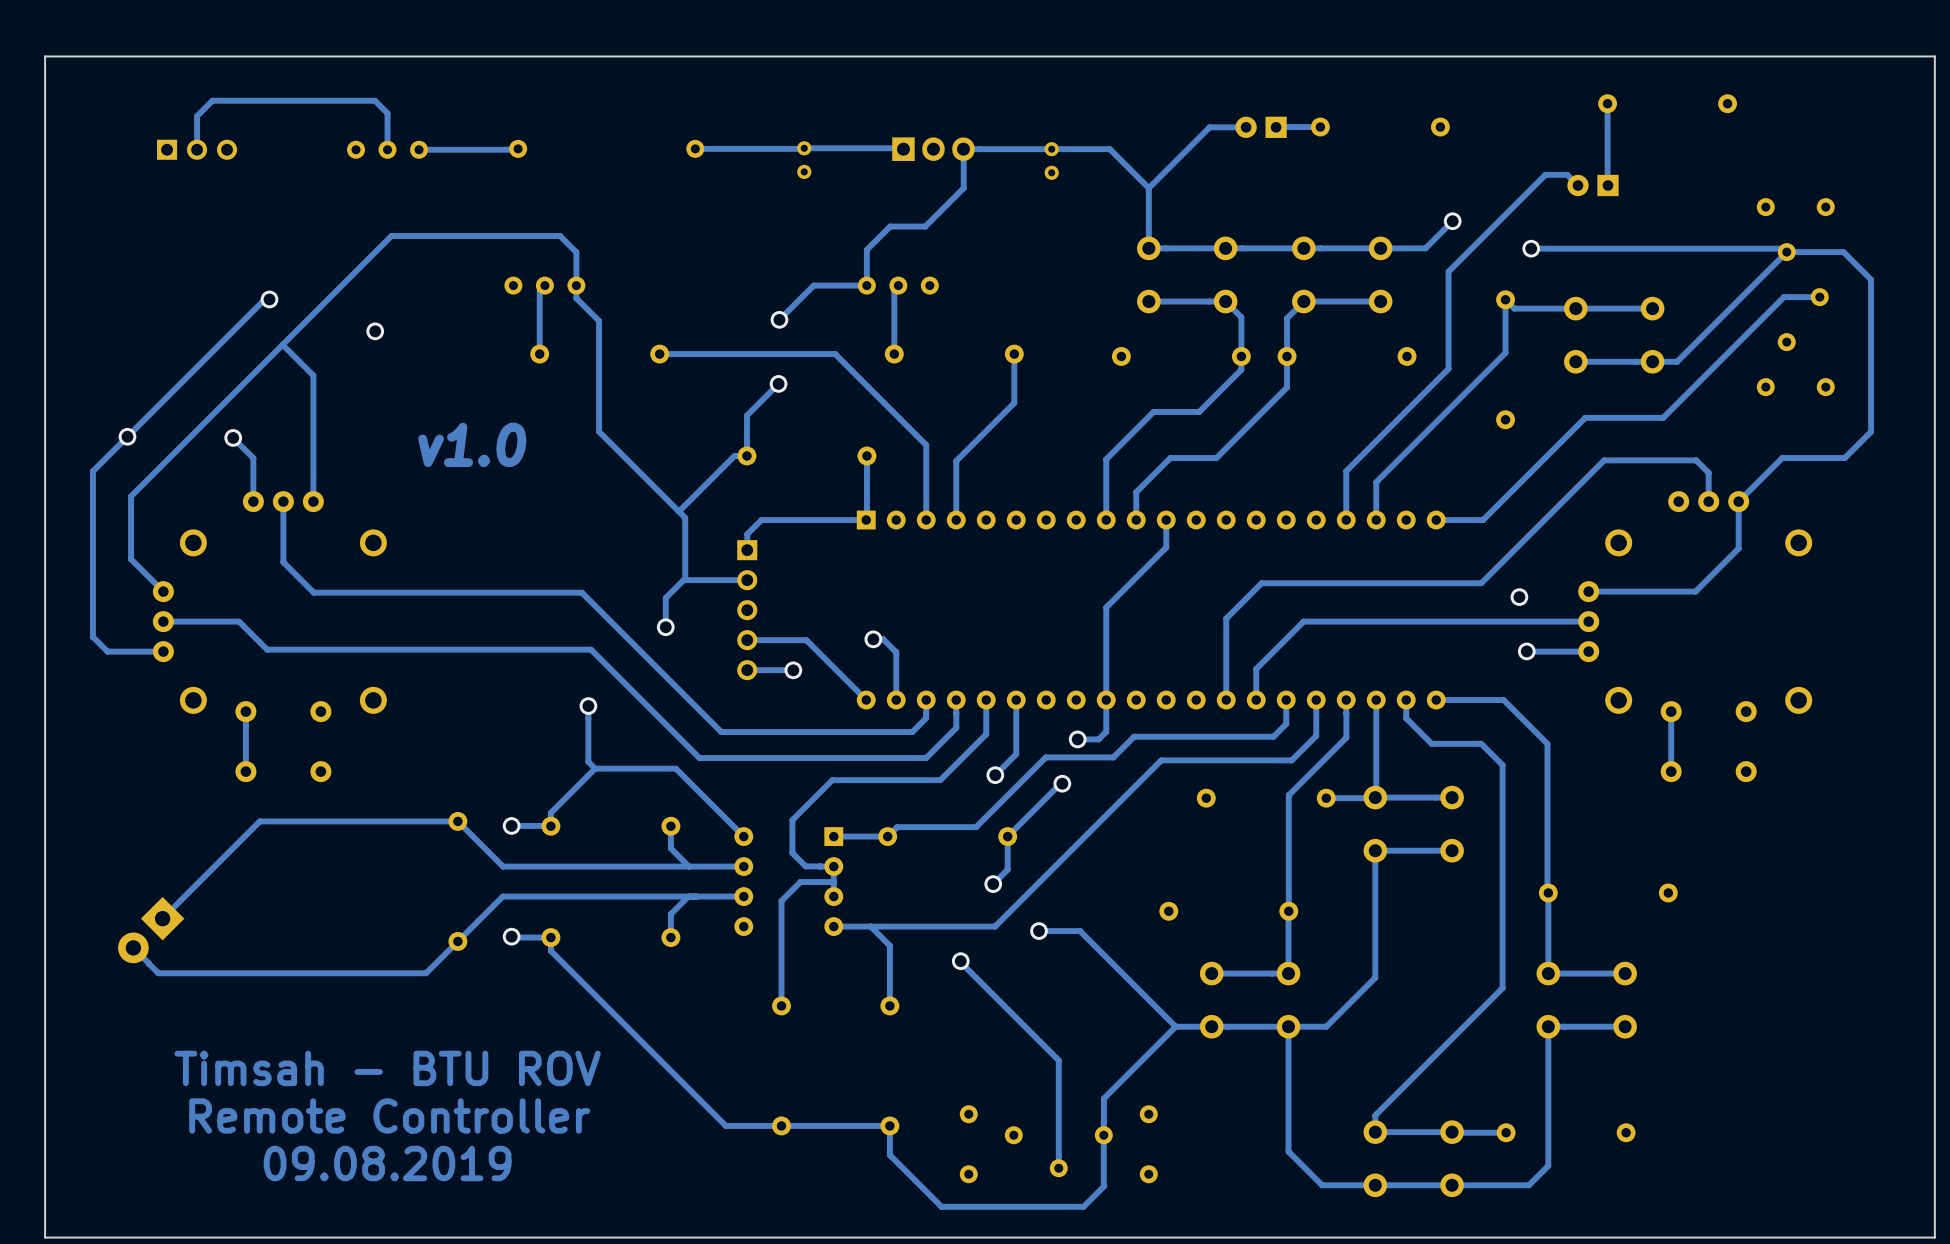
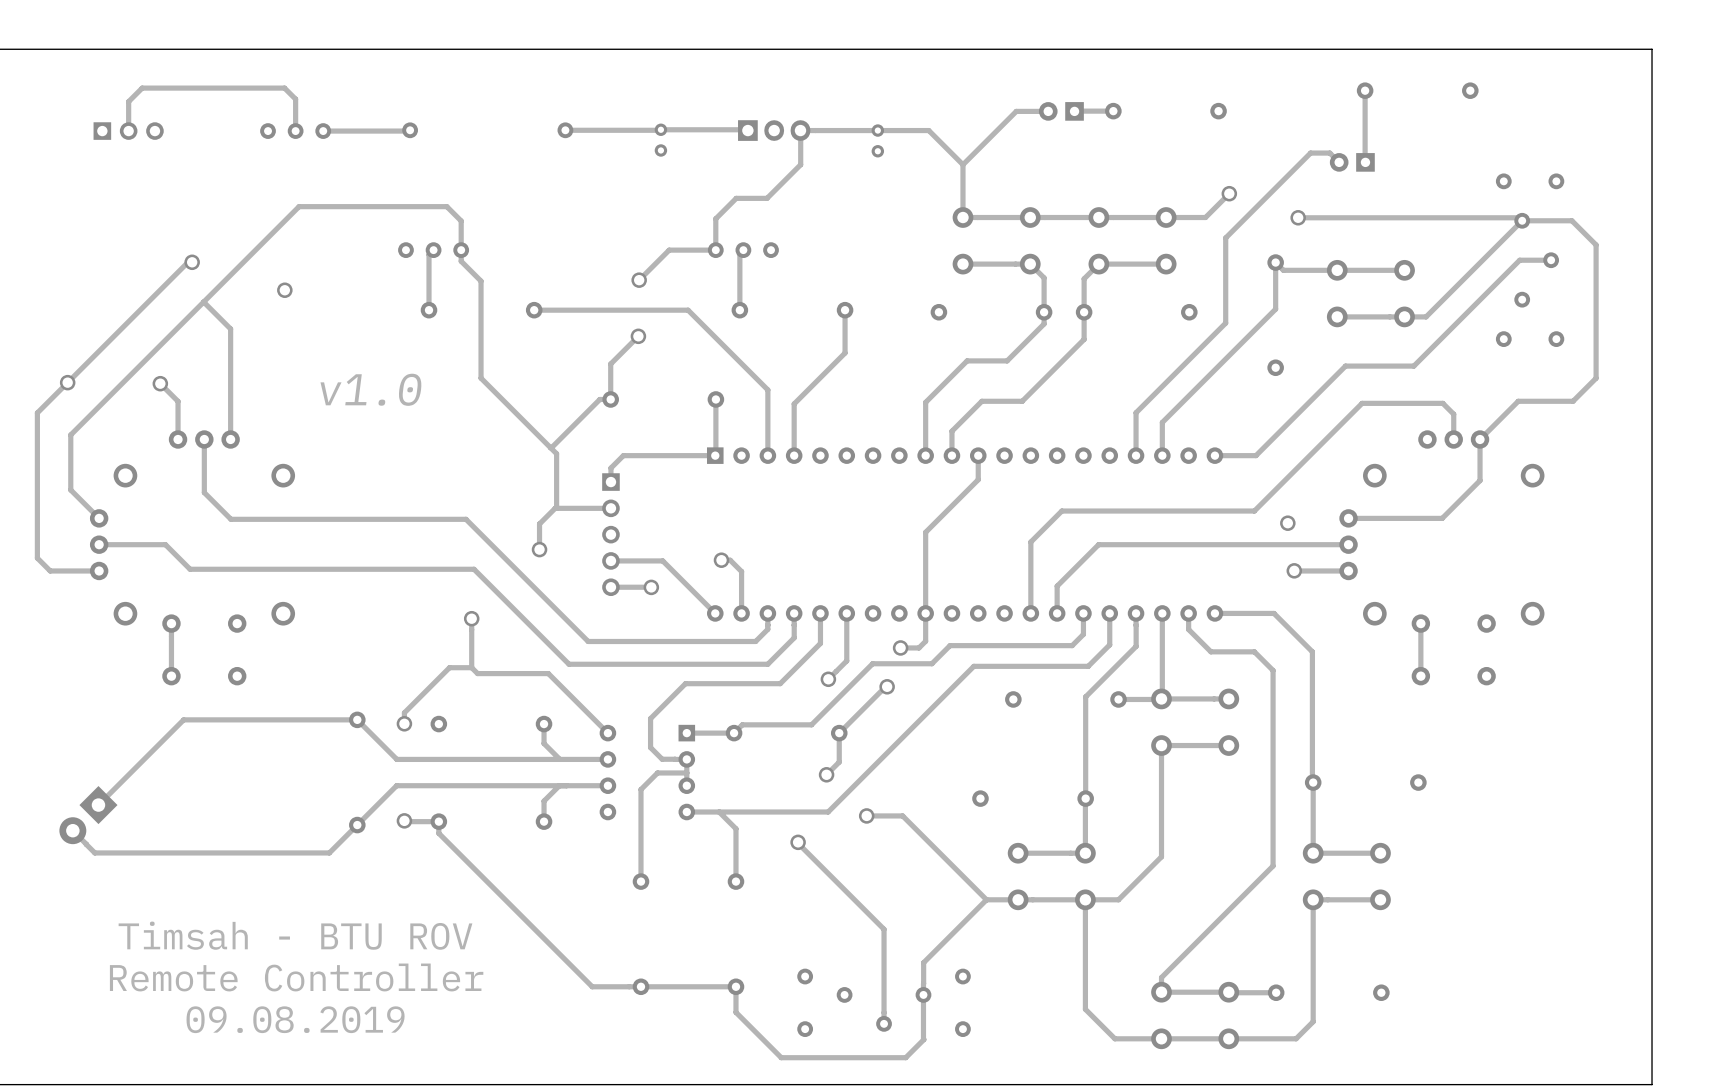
track: (595, 768) (550, 812) (550, 826) (511, 825) -> (471, 667) (449, 667) (404, 712) (404, 723)

